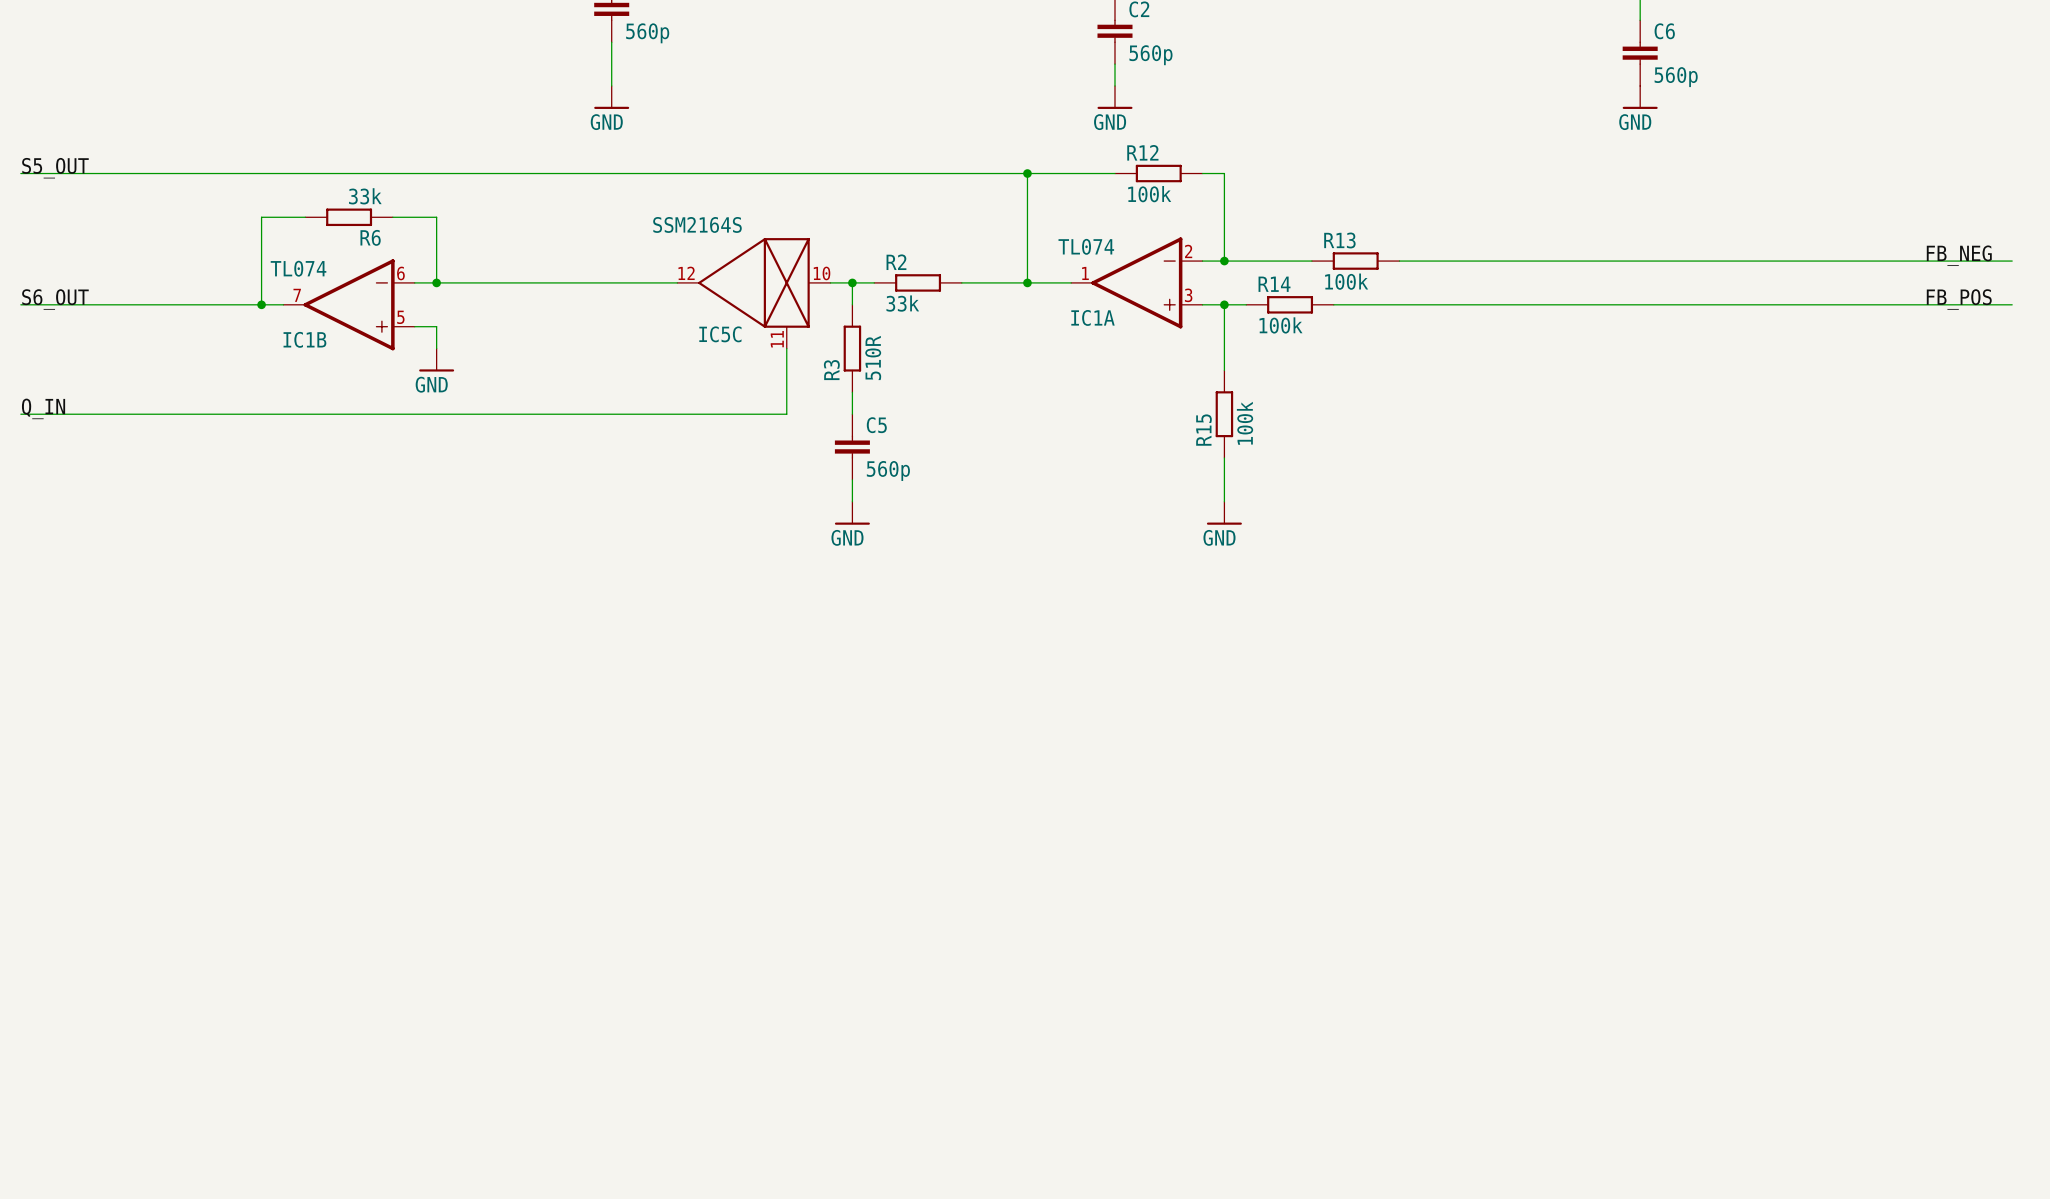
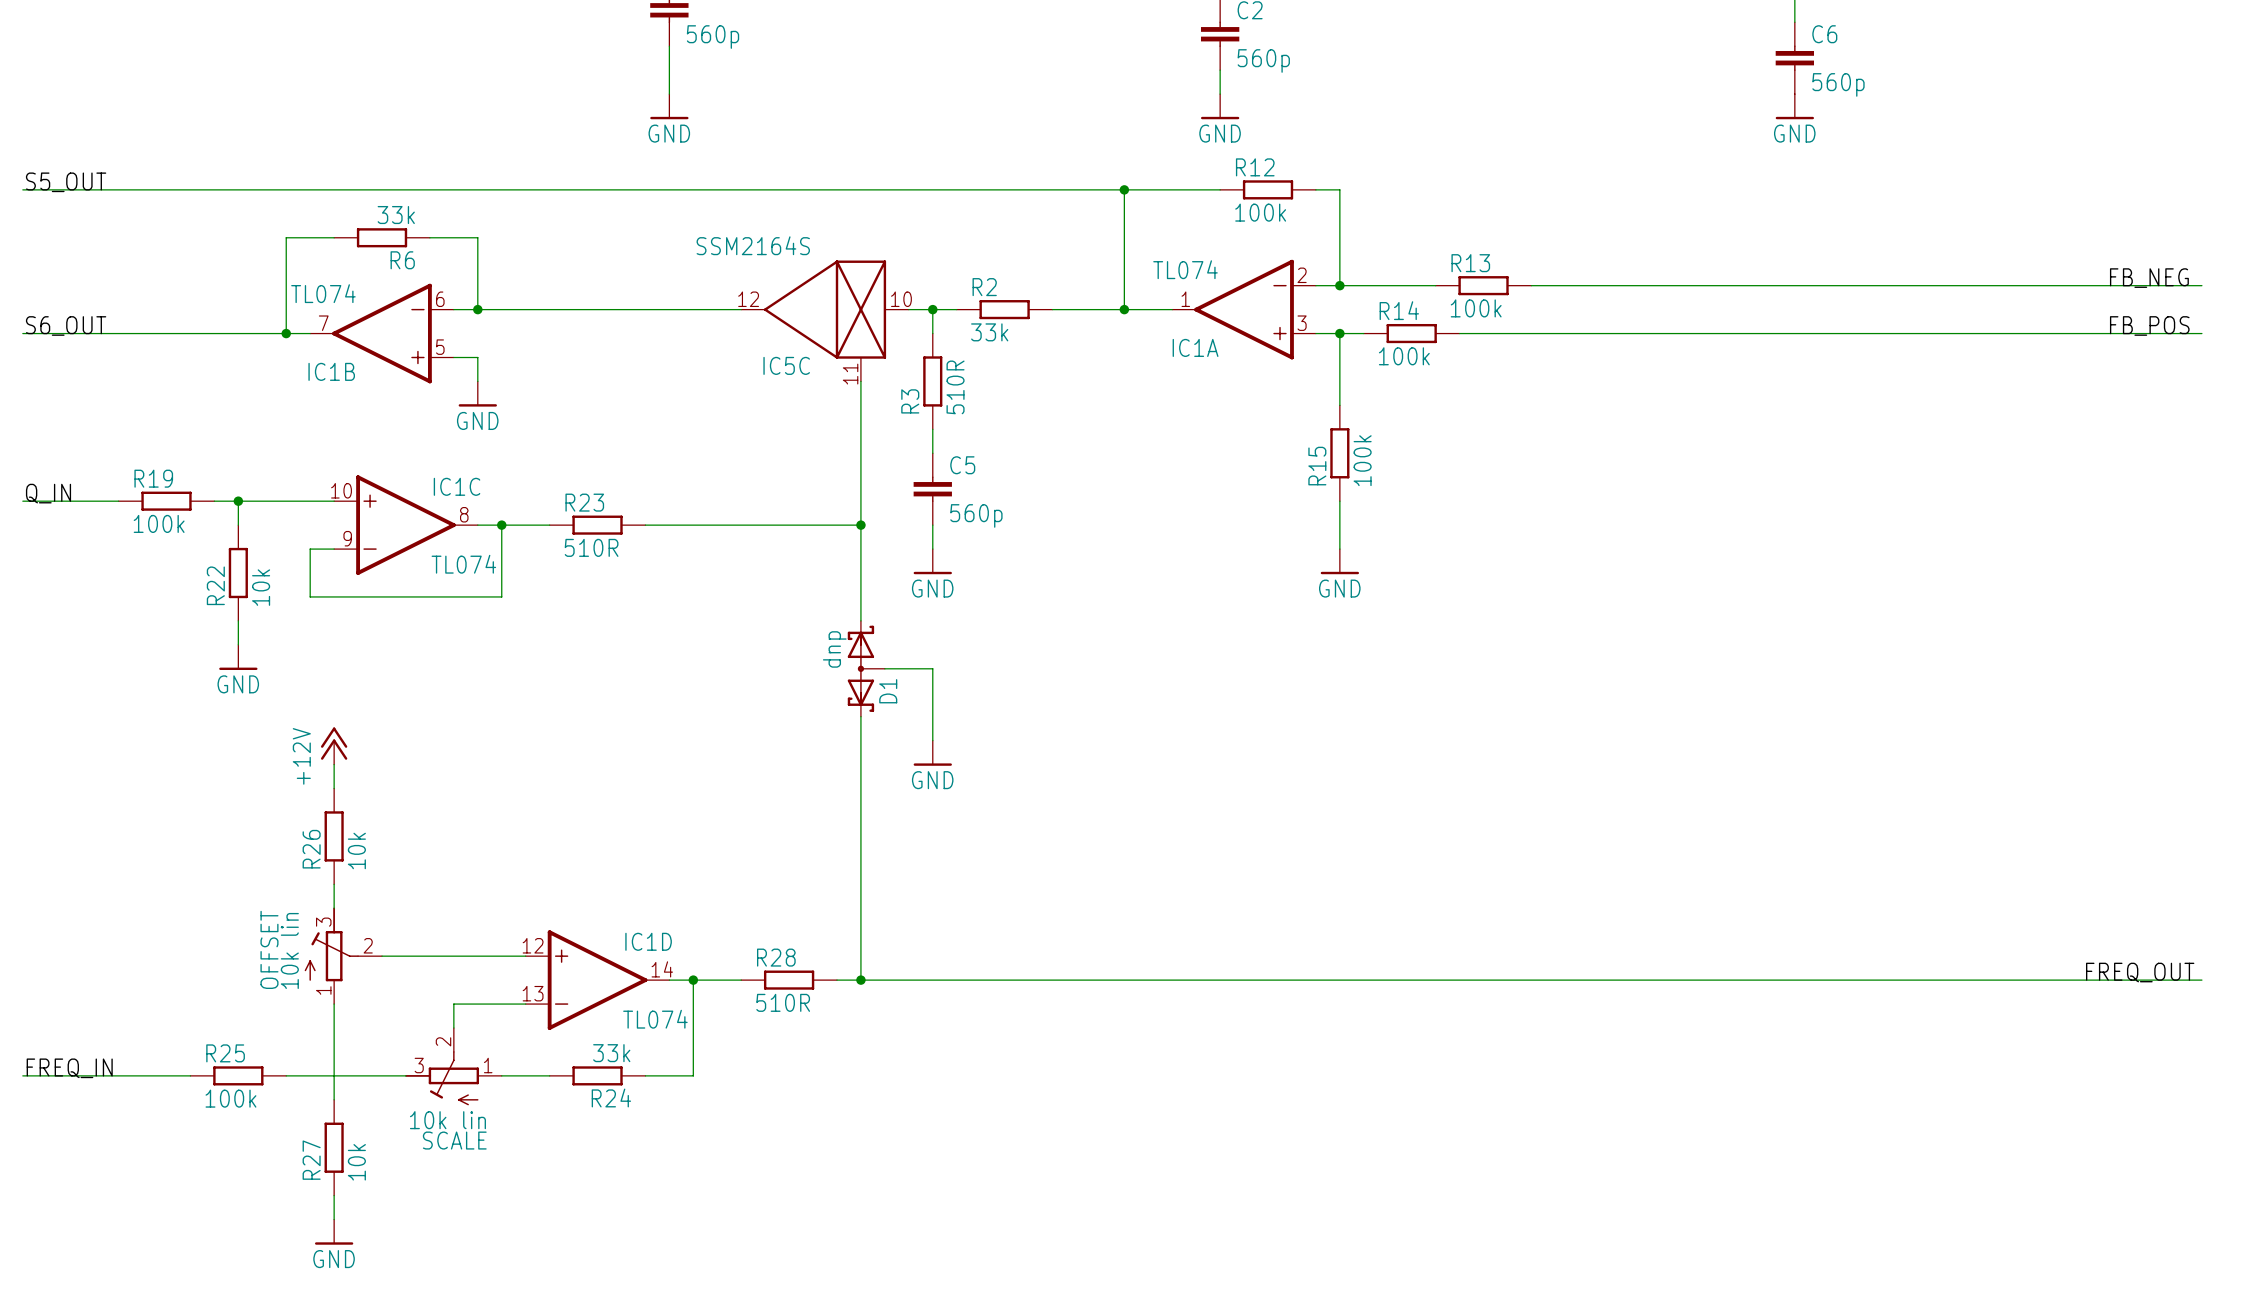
label position: Q_IN (43, 408) -> Q_IN (48, 493)
wire: (20, 414) (786, 414) -> (860, 620) (860, 453)
wire: none -> (22, 501) (118, 501)
R19: none -> 100k (166, 501)
wire: none -> (214, 501) (334, 501)
wire: none -> (238, 501) (238, 525)
junction: none -> (238, 501)
IC1C: none -> TL074 (405, 525)
wire: none -> (477, 525) (549, 525)
wire: none -> (501, 525) (501, 596) (310, 596) (310, 549) (334, 549)
junction: none -> (501, 525)
R23: none -> 510R (597, 525)
wire: none -> (645, 525) (860, 525)
junction: none -> (860, 525)
R22: none -> 10k (238, 573)
wire: none -> (238, 620) (238, 644)
power symbol: none -> GND (238, 657)
D1: none -> dnp (866, 668)
wire: none -> (884, 668) (932, 668) (932, 740)
wire: none -> (860, 716) (860, 980)
power symbol: none -> +12V (334, 746)
power symbol: none -> GND (932, 753)
wire: none -> (334, 764) (334, 788)
R26: none -> 10k (334, 836)
wire: none -> (334, 884) (334, 908)
OFFSET: none -> 10k lin (343, 955)
wire: none -> (382, 956) (525, 956)
label: none -> FREQ_OUT (2140, 972)
IC1D: none -> TL074 (597, 980)
wire: none -> (669, 980) (741, 980)
wire: none -> (693, 980) (693, 1075) (645, 1075)
junction: none -> (693, 980)
R28: none -> 510R (789, 980)
wire: none -> (837, 980) (2201, 980)
junction: none -> (860, 980)
wire: none -> (334, 1004) (334, 1099)
wire: none -> (525, 1004) (453, 1004) (453, 1027)
SCALE: none -> 10k lin (453, 1066)
label: none -> FREQ_IN (69, 1068)
wire: none -> (22, 1075) (190, 1075)
R25: none -> 100k (238, 1075)
wire: none -> (286, 1075) (405, 1075)
wire: none -> (501, 1075) (549, 1075)
R24: none -> 33k (597, 1075)
R27: none -> 10k (334, 1147)
wire: none -> (334, 1195) (334, 1219)
power symbol: none -> GND (334, 1232)

